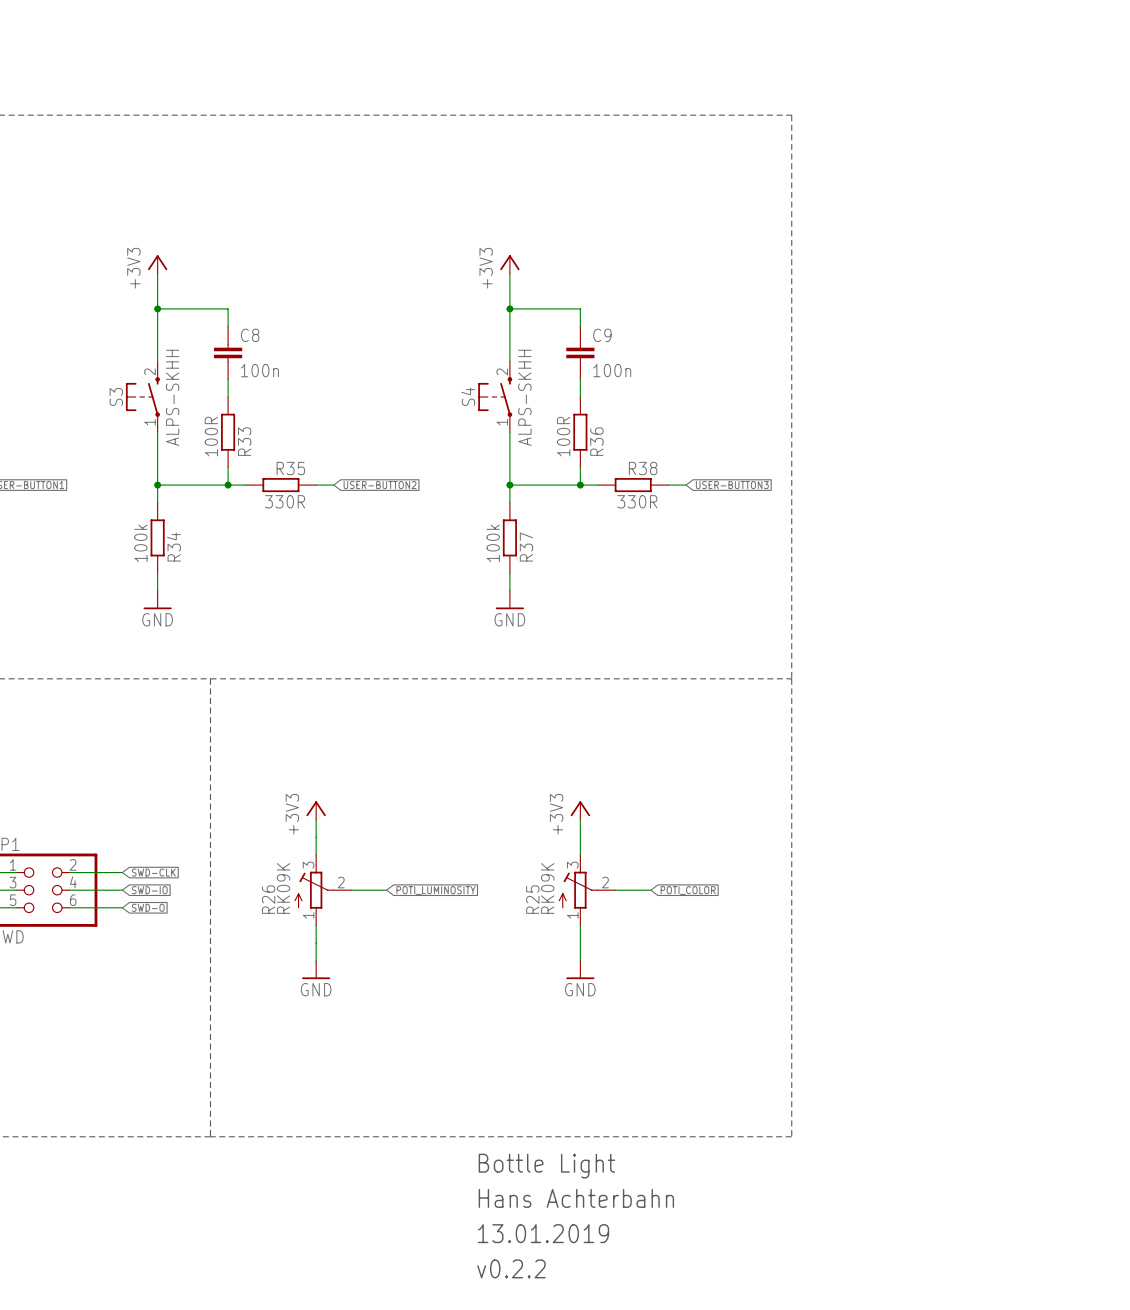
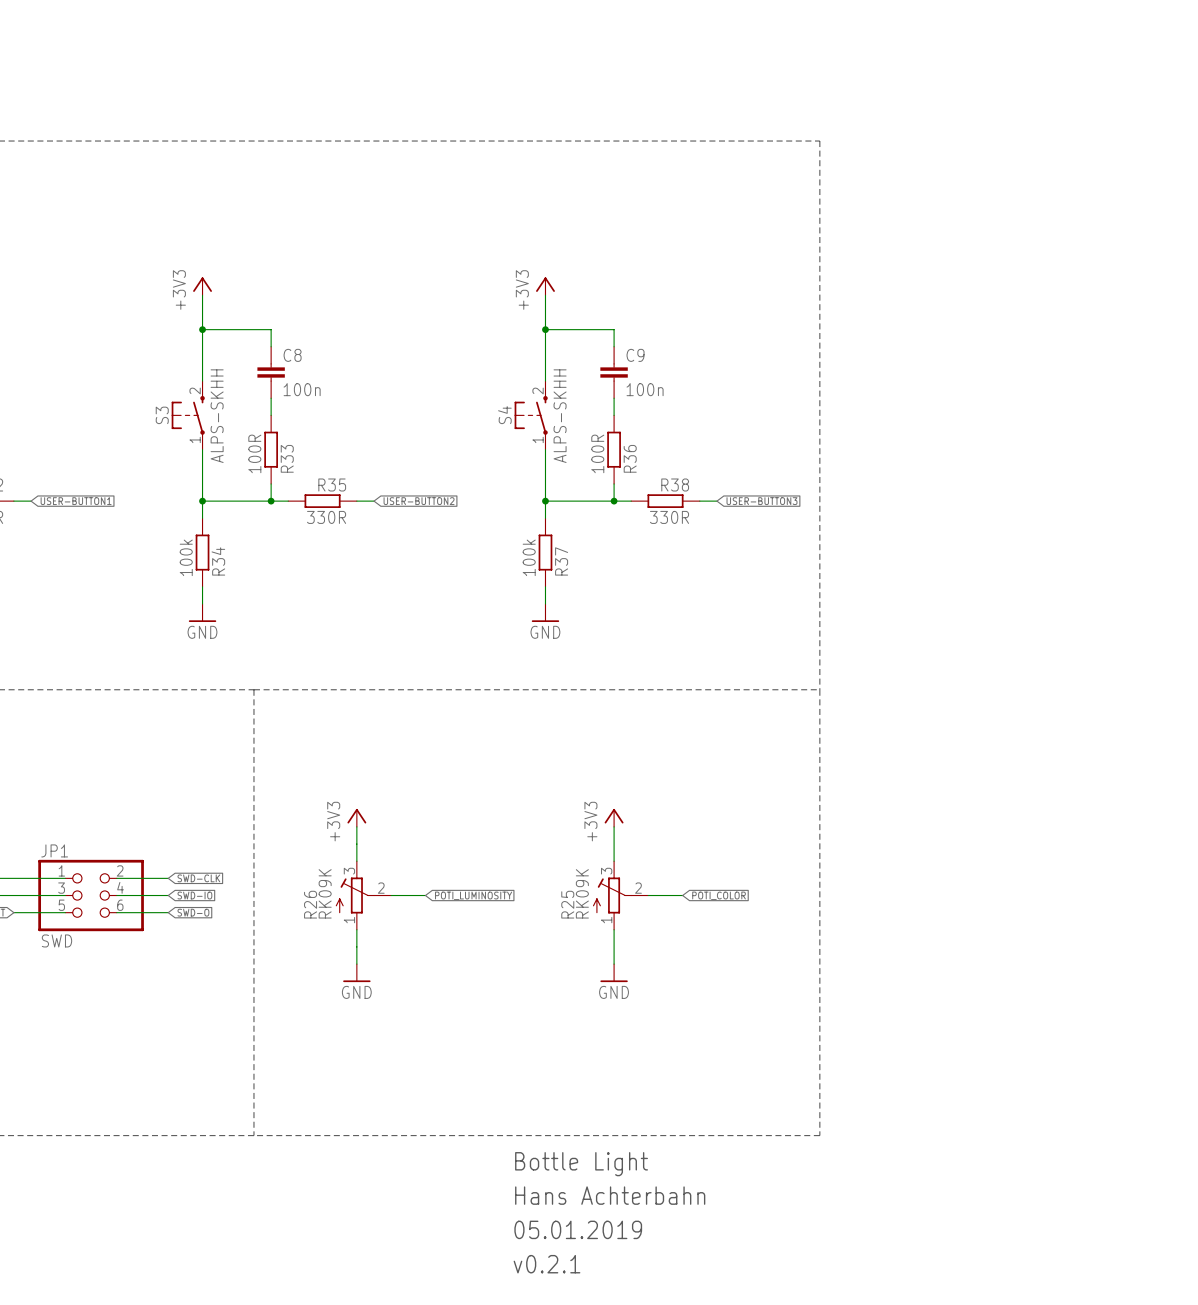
text: 13.01.2019 (543, 1233) -> 05.01.2019 (578, 1229)
text: v0.2.2 (511, 1268) -> v0.2.1 (547, 1264)

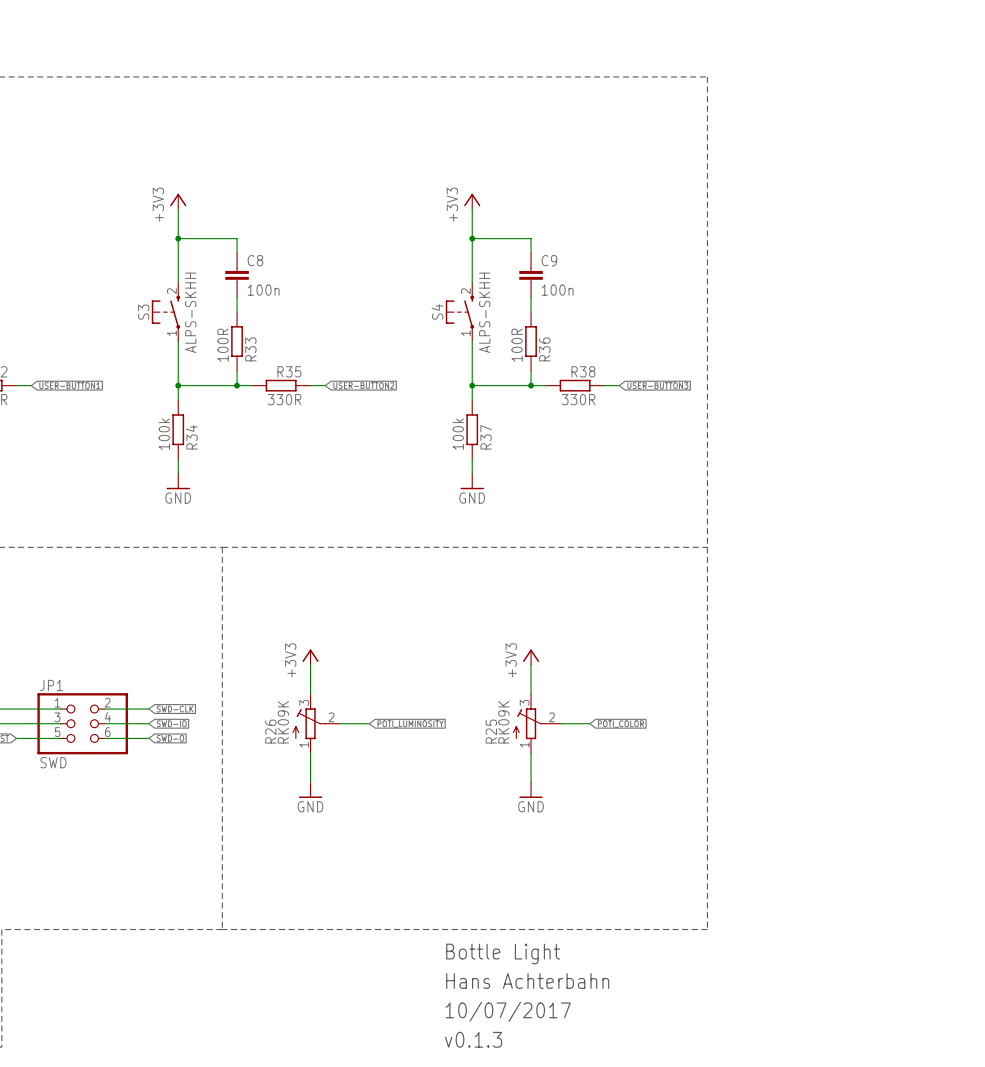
text: 05.01.2019 (578, 1229) -> 10/07/2017 (508, 1011)
text: v0.2.1 (547, 1264) -> v0.1.3 (473, 1039)

